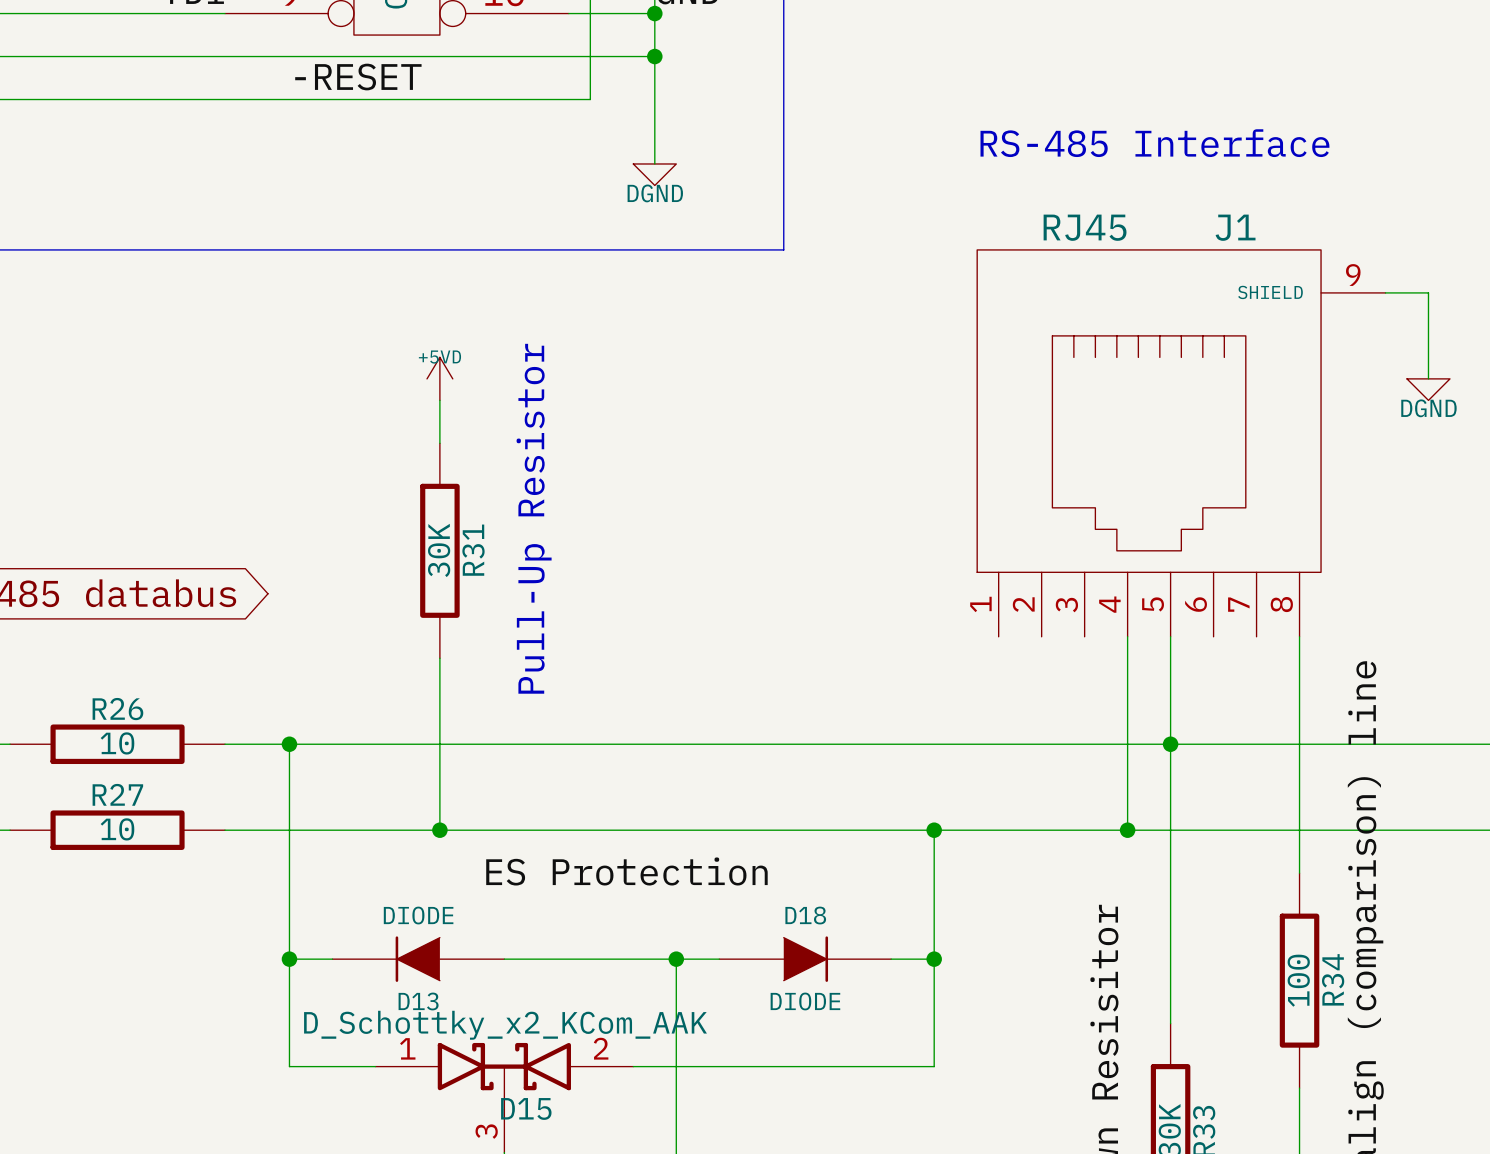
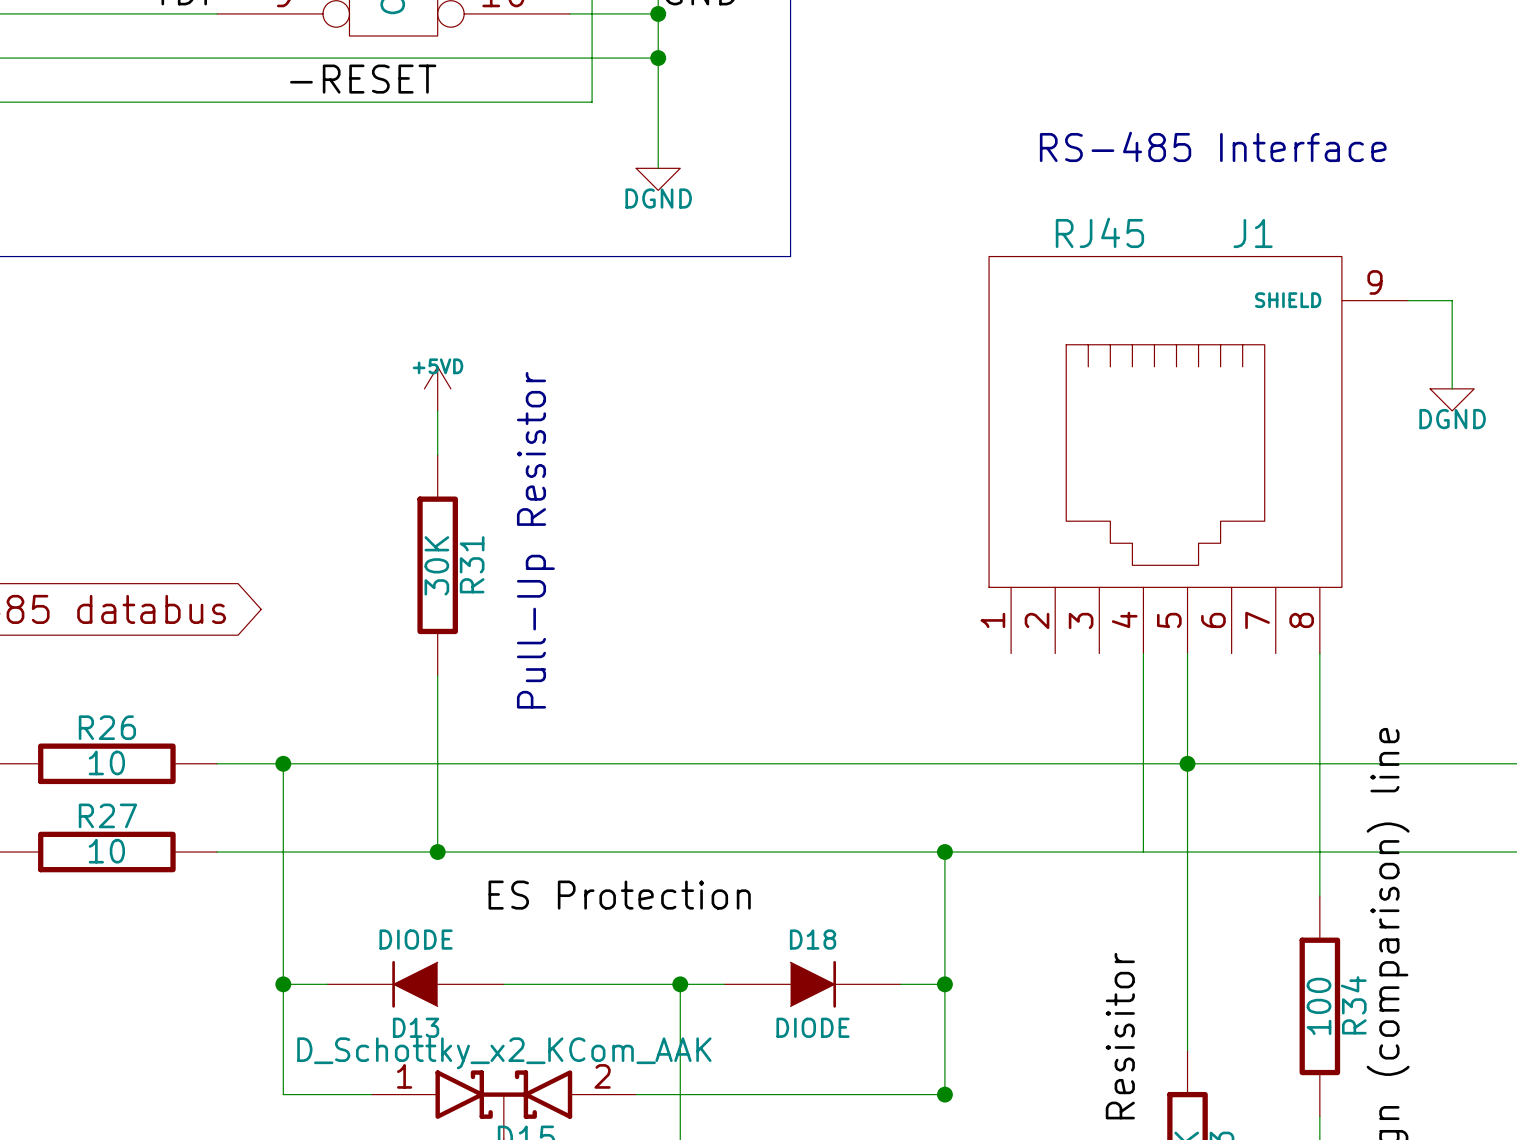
text position: RS-485 Interface (1154, 143) -> RS-485 Interface (1213, 146)
junction: (1127, 830) -> none
junction: none -> (944, 1094)

